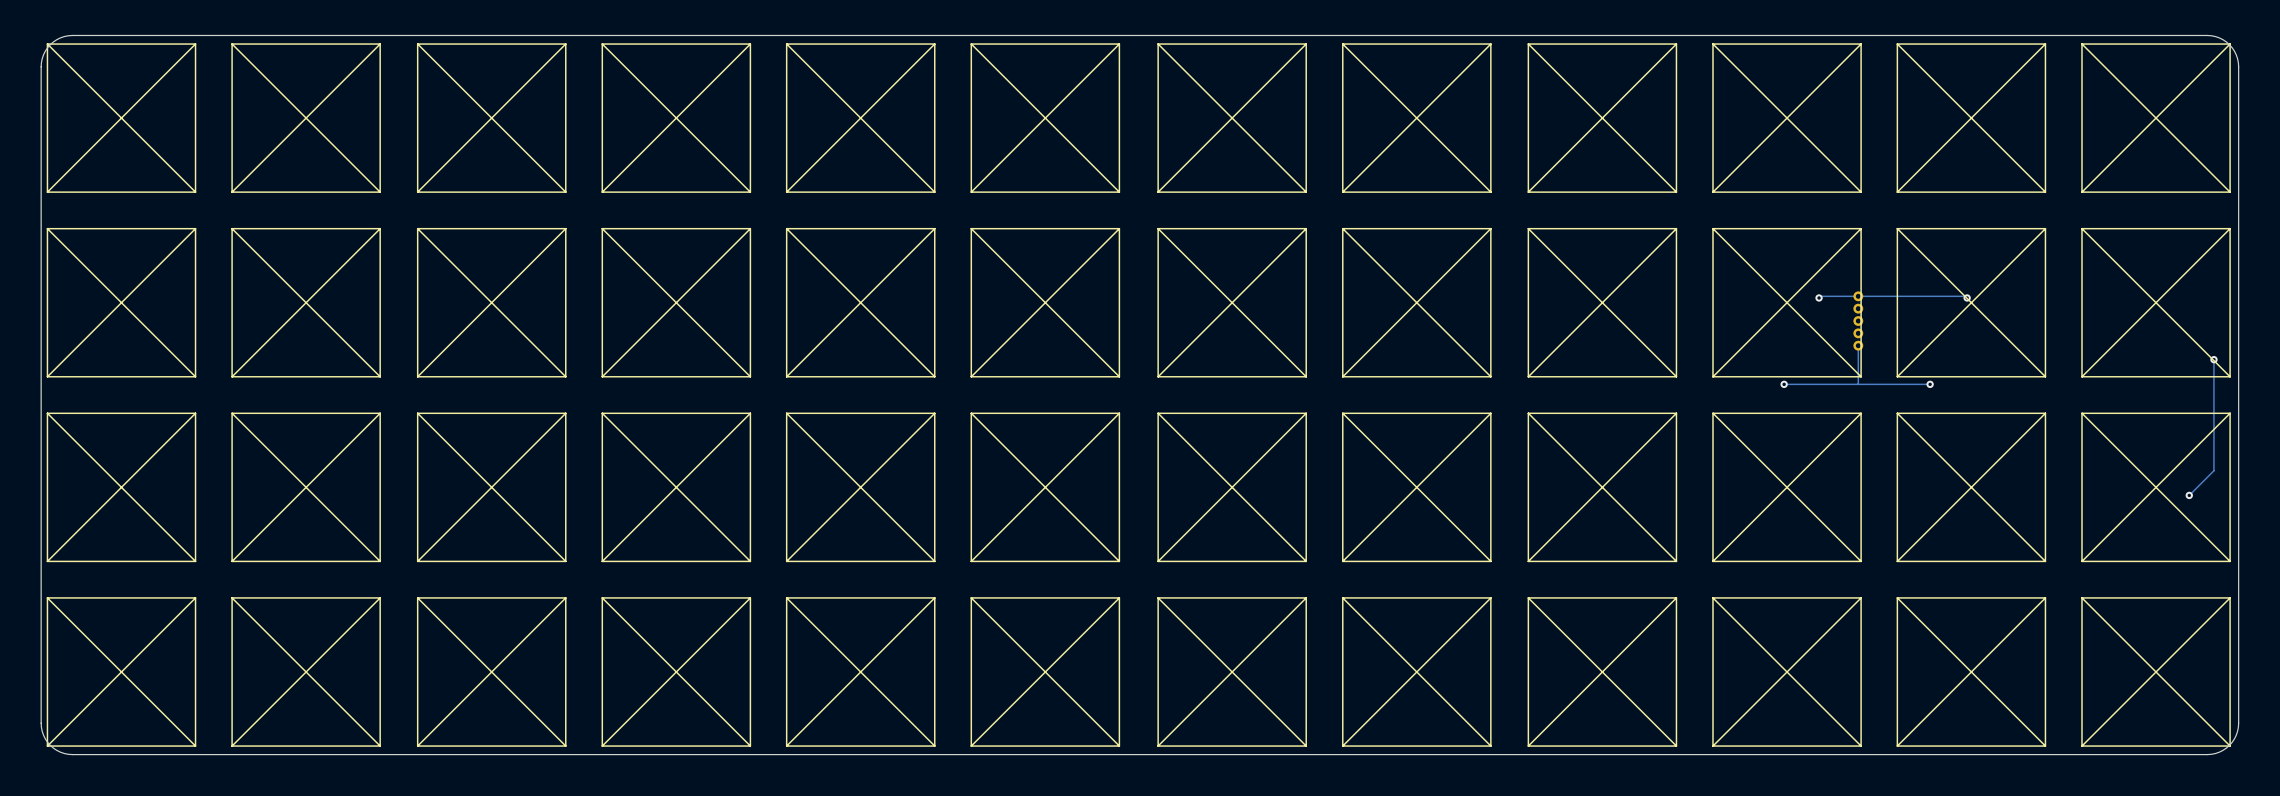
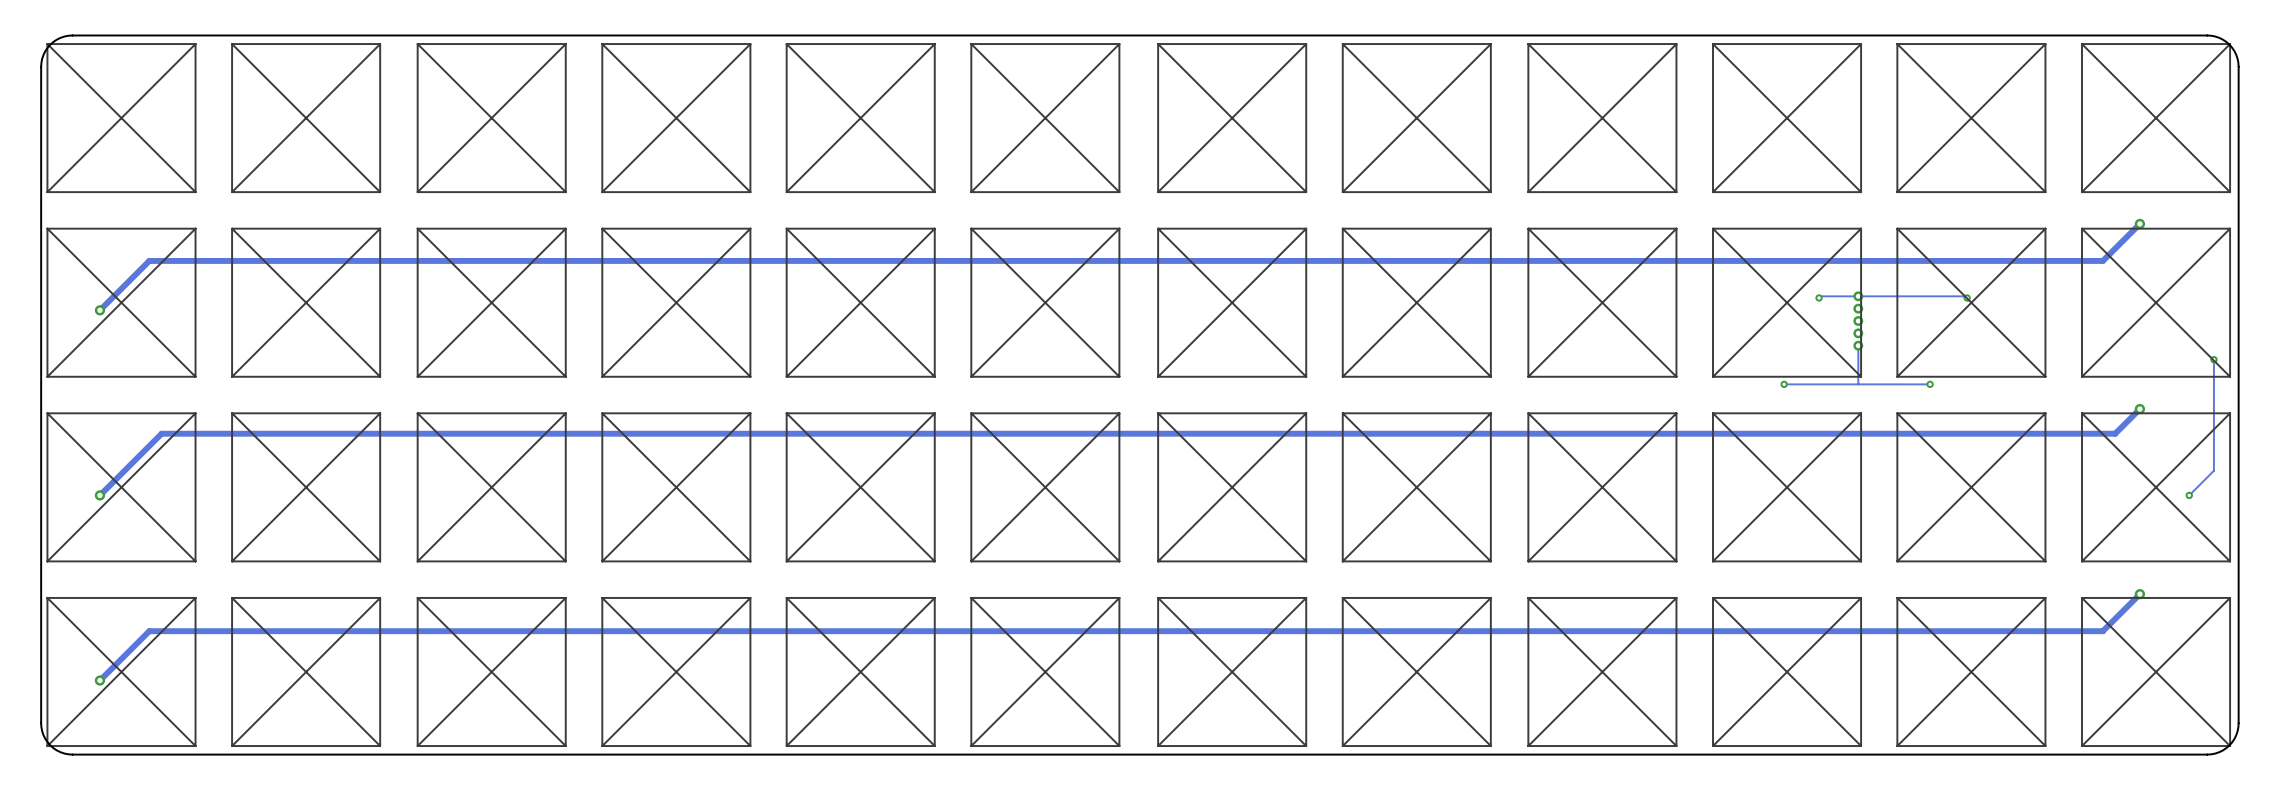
track: none -> (2139, 223) (2102, 260) (149, 260) (99, 310)
via: none -> (2139, 223)
via: none -> (99, 310)
track: none -> (2139, 409) (2115, 433) (161, 433) (99, 495)
via: none -> (2139, 409)
via: none -> (99, 495)
track: none -> (2139, 594) (2102, 631) (149, 631) (99, 680)
via: none -> (2139, 594)
via: none -> (99, 680)

